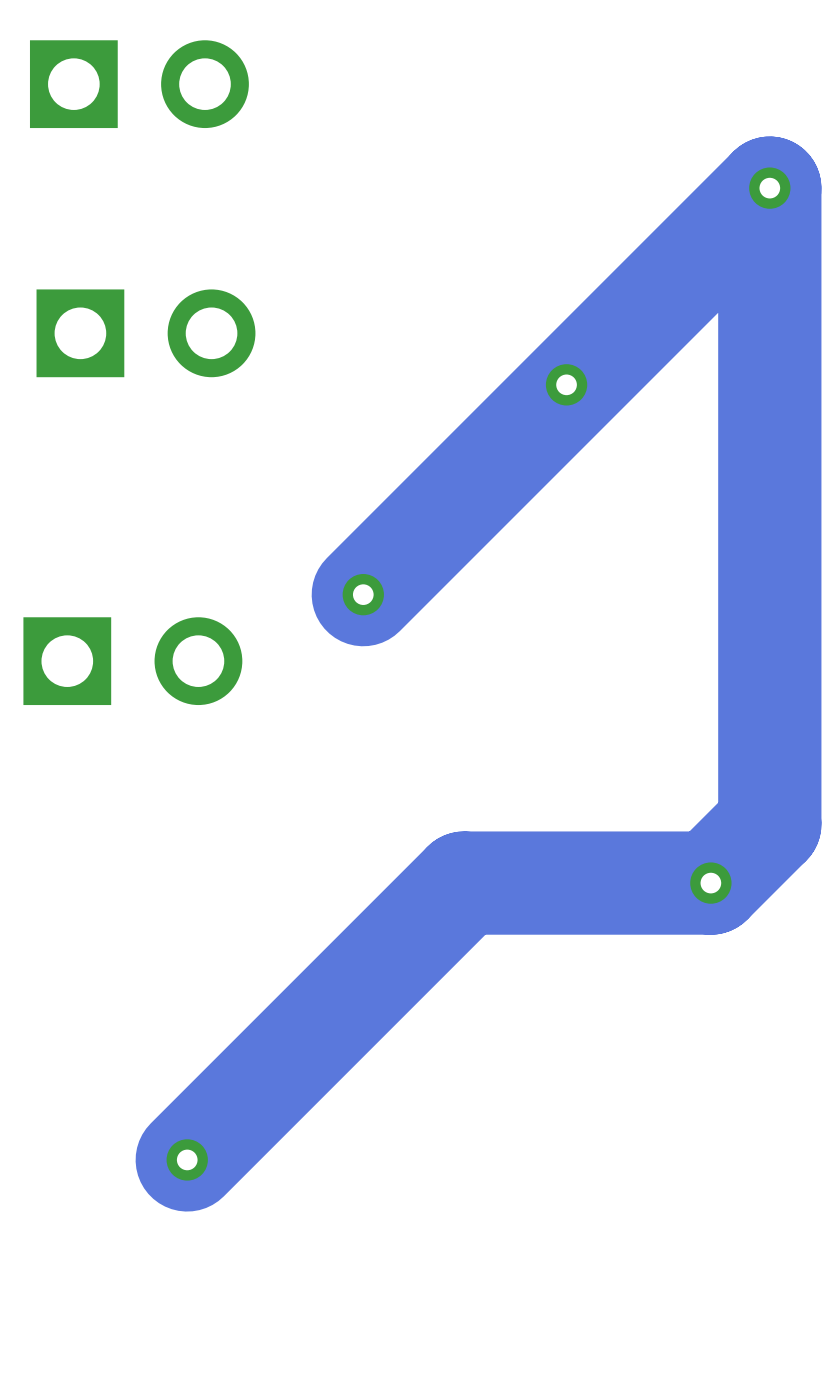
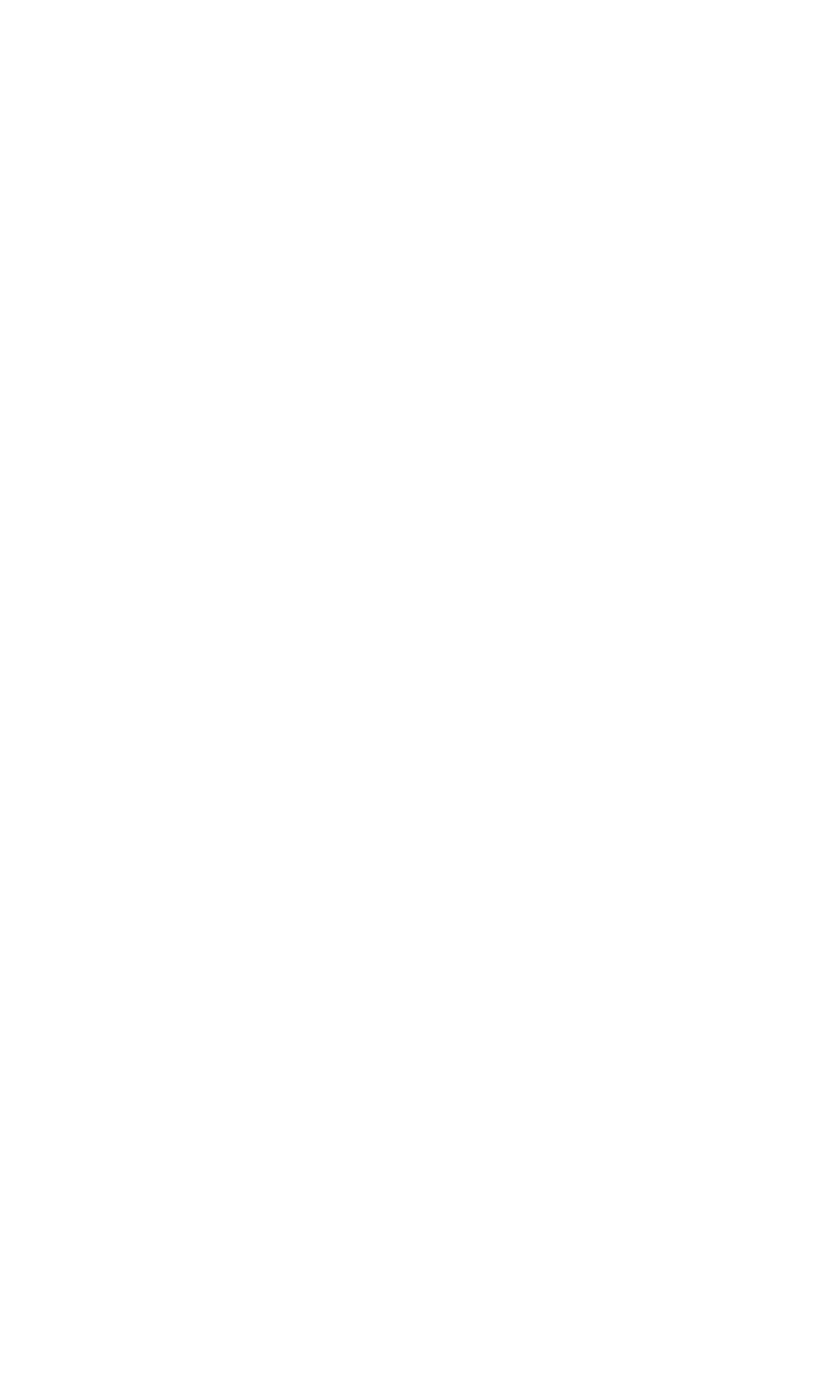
part: (139, 84) -> none
via: (769, 188) -> none
part: (145, 333) -> none
via: (566, 384) -> none
track: (363, 594) (769, 188) (769, 824) (710, 883) (464, 883) (187, 1159) -> none
via: (363, 594) -> none
part: (132, 661) -> none
via: (710, 883) -> none
via: (187, 1159) -> none

